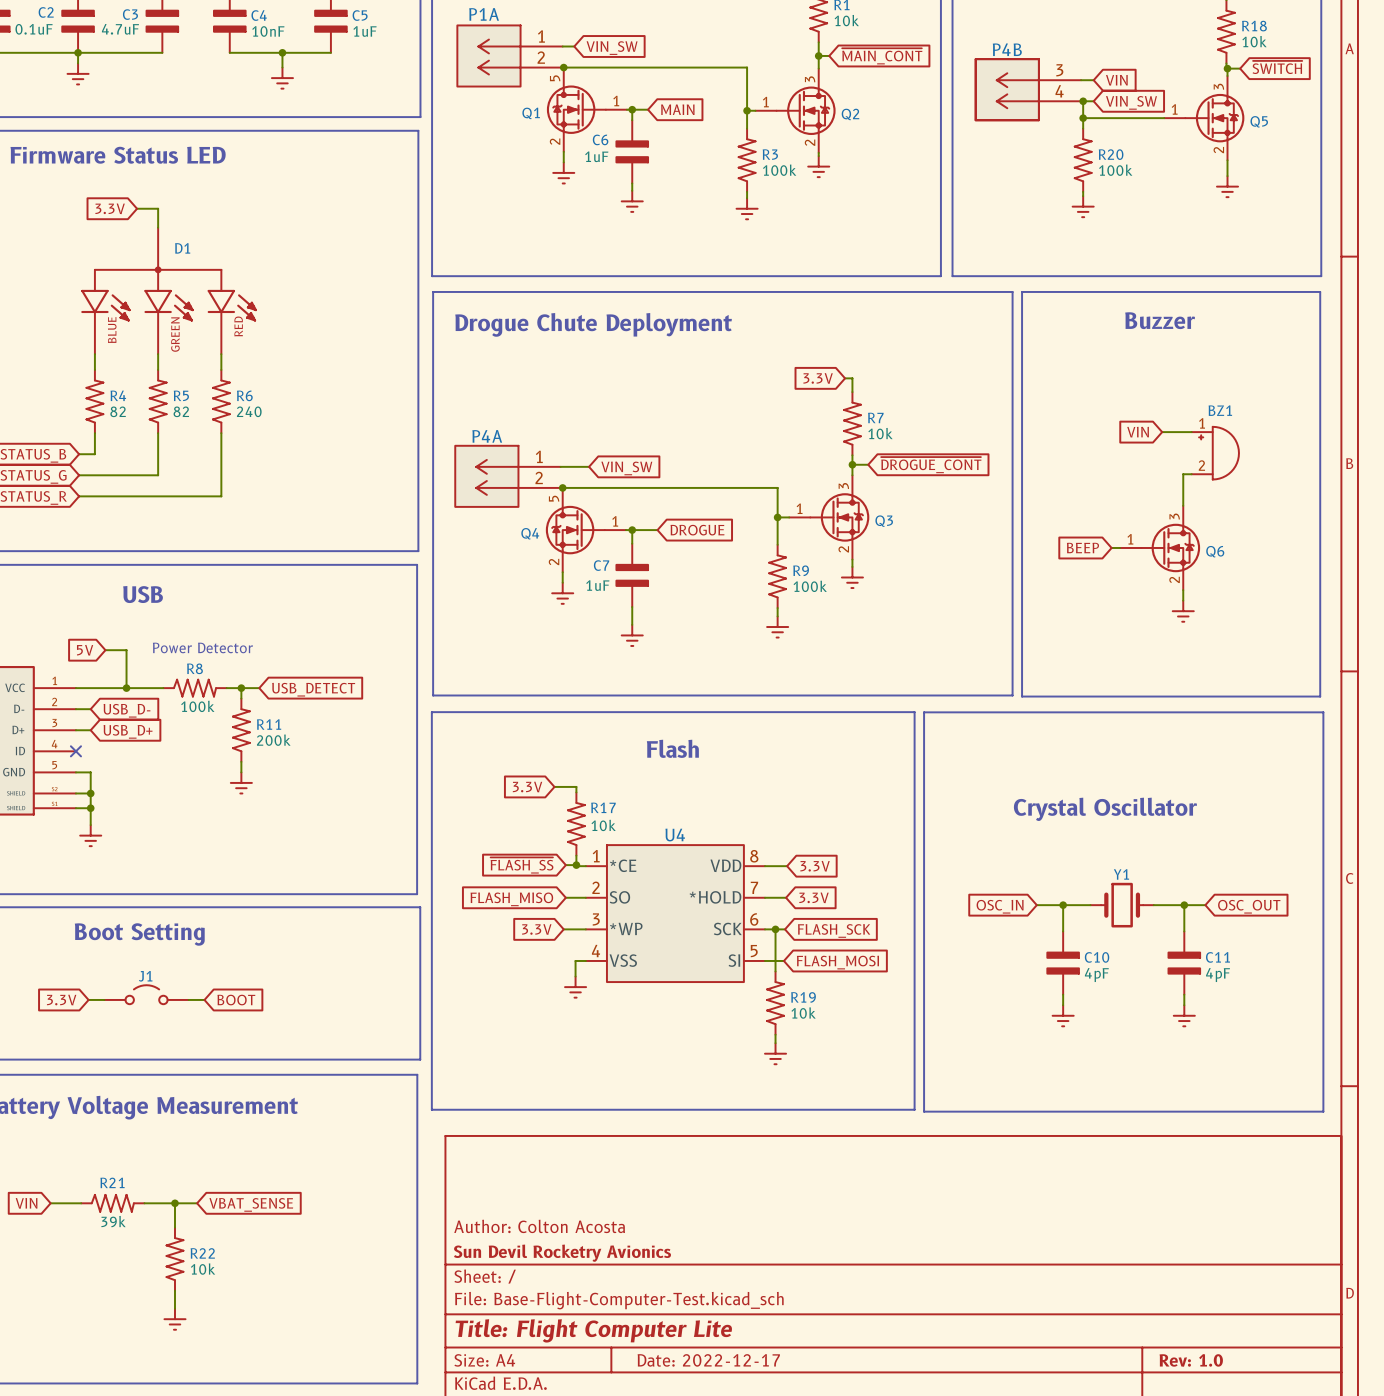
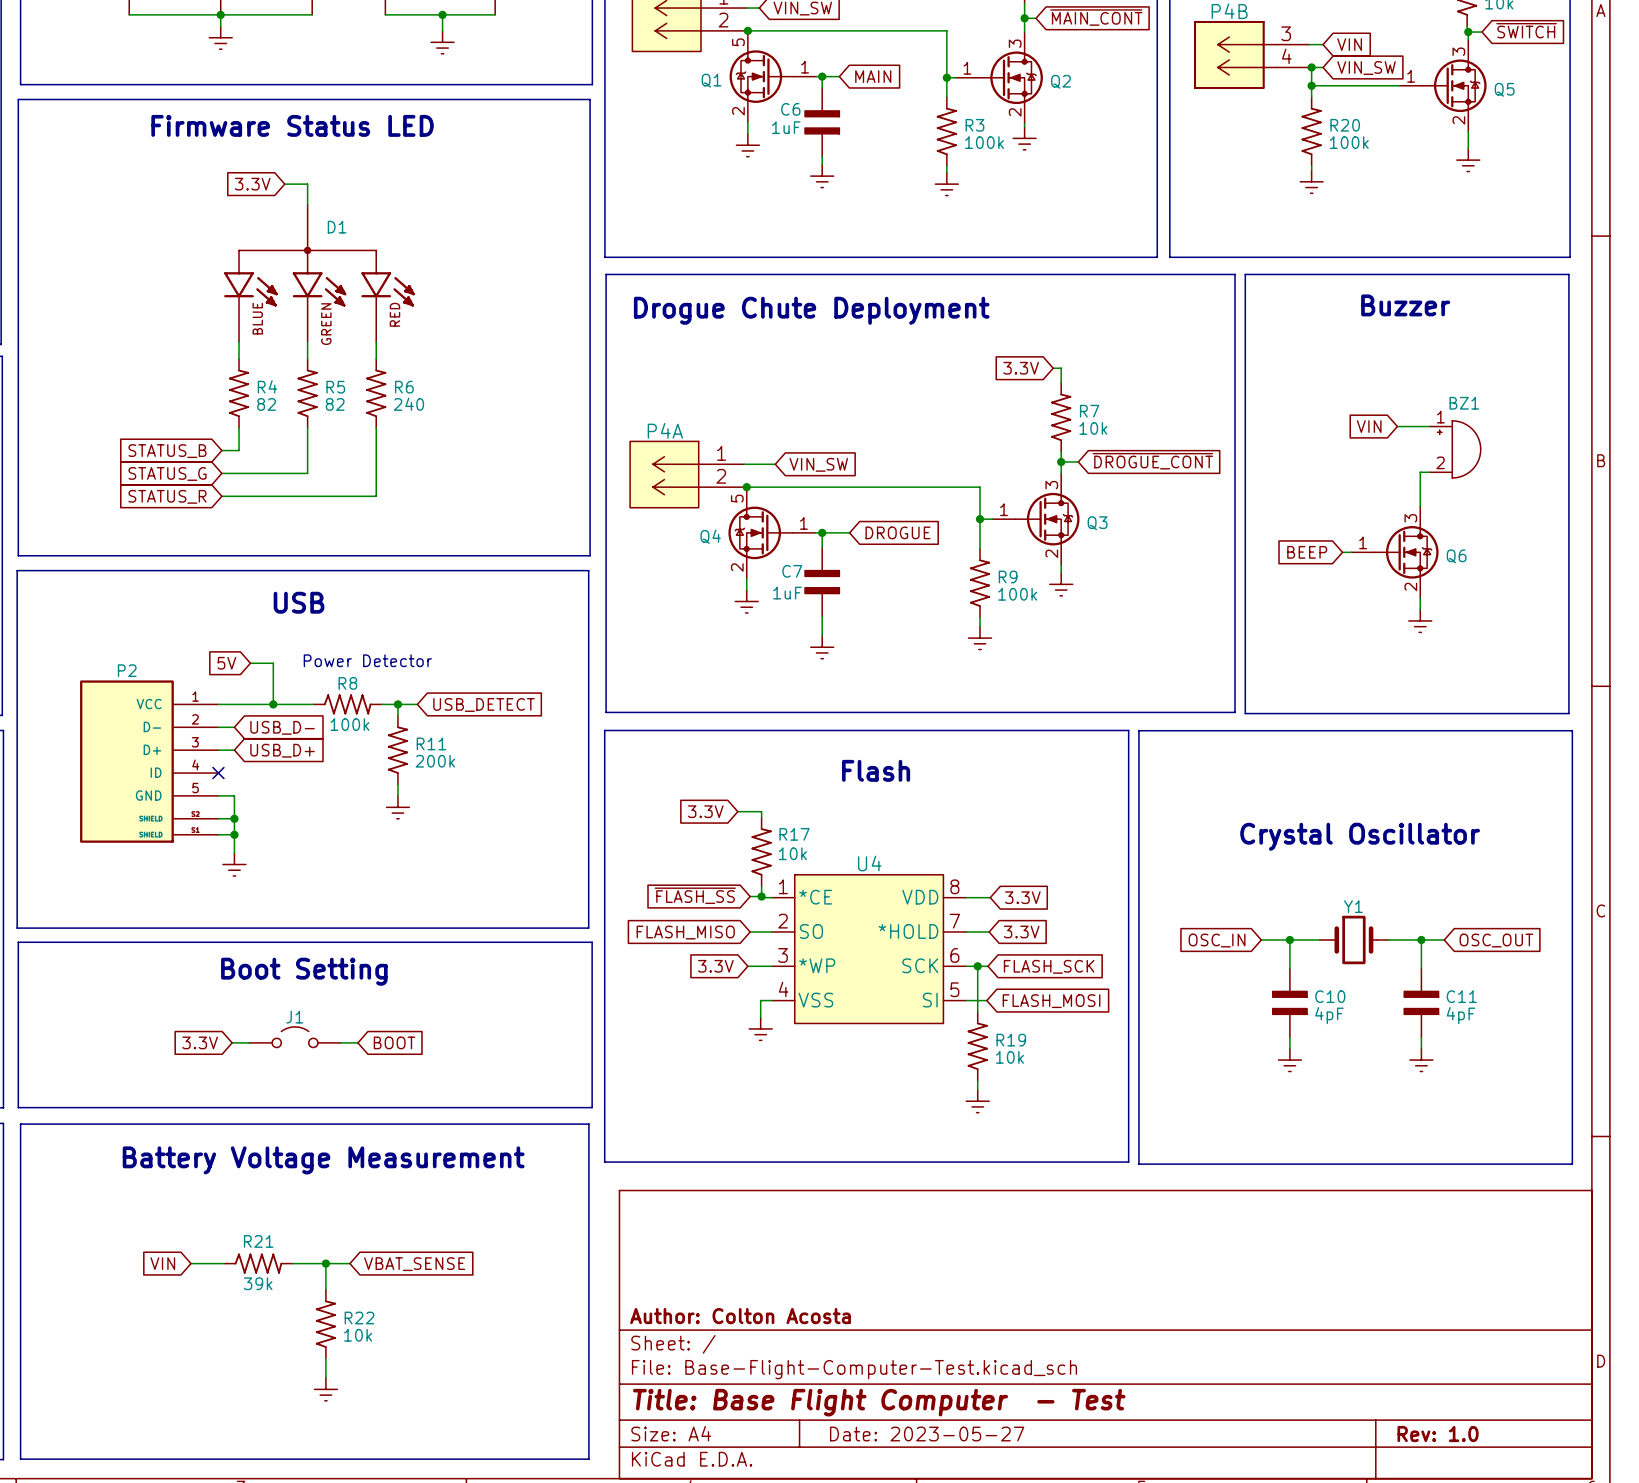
title block: Author: Colton Acosta (539, 1226) -> none
title block: Sun Devil Rocketry Avionics (562, 1253) -> Author: Colton Acosta (740, 1316)
title block: Title: Flight Computer Lite (593, 1330) -> Title: Base Flight Computer - Test (879, 1402)
title block: Date: 2022-12-17 (708, 1360) -> Date: 2023-05-27 (927, 1434)

